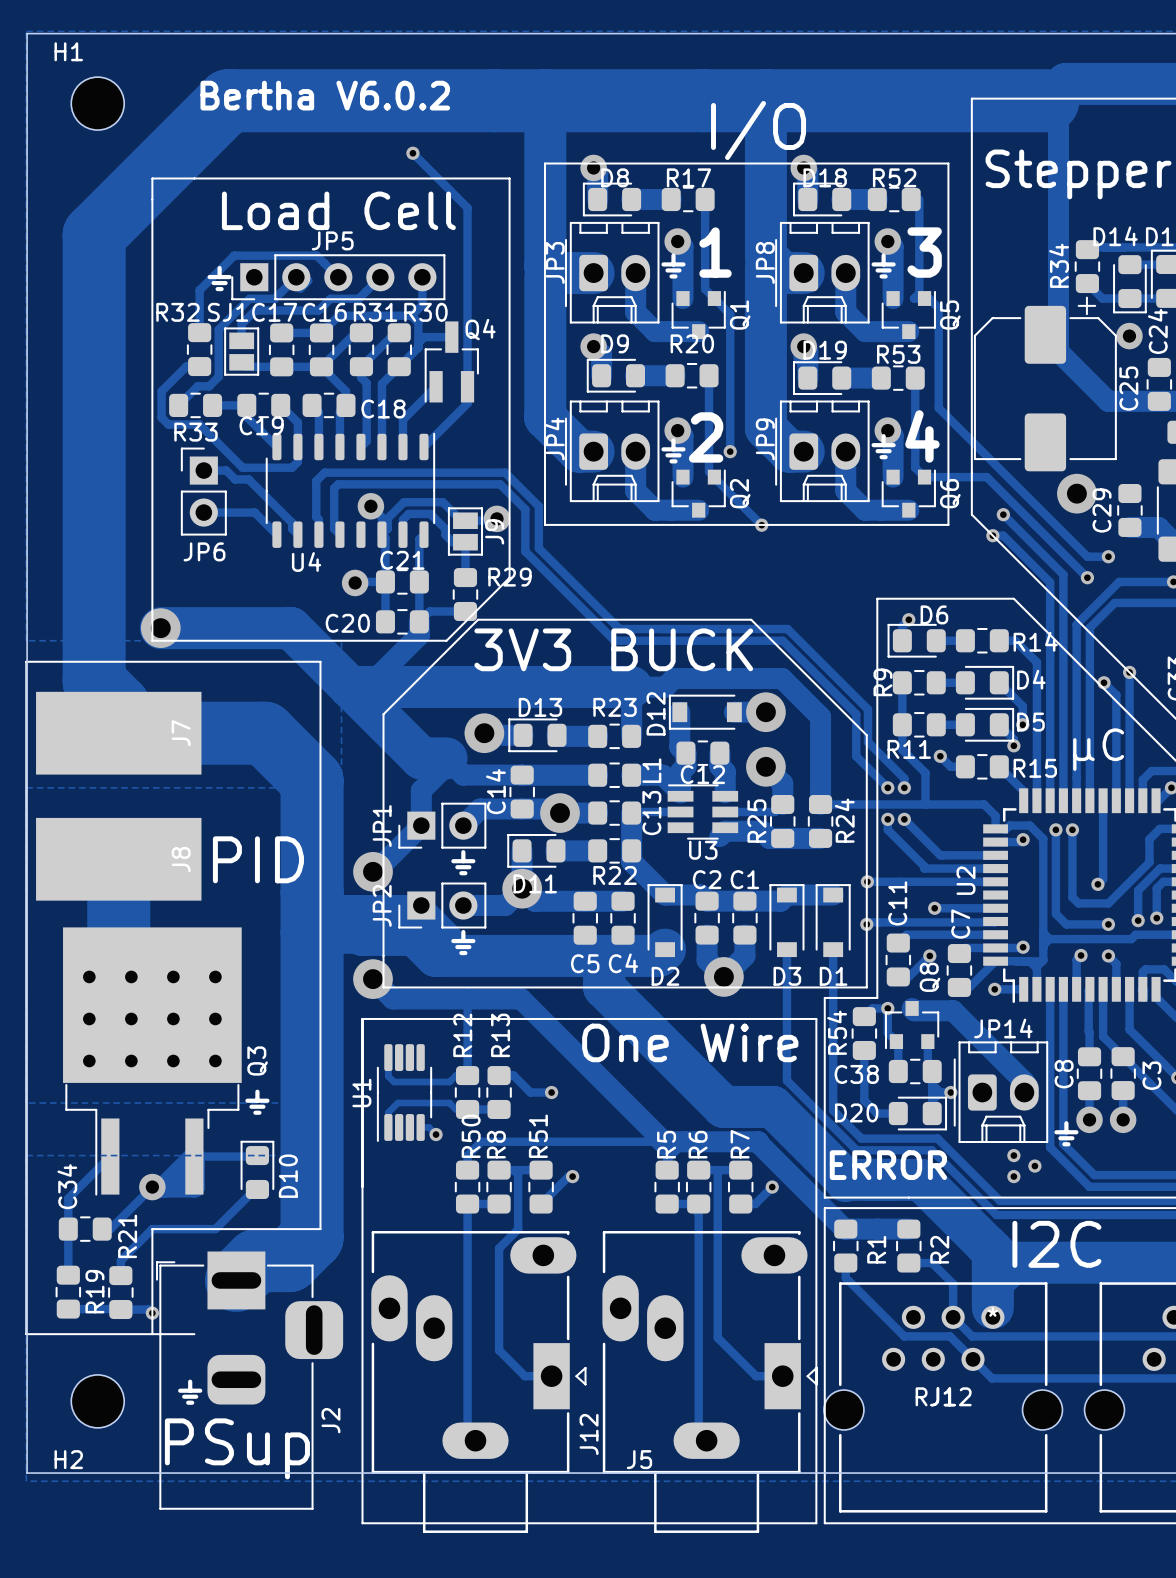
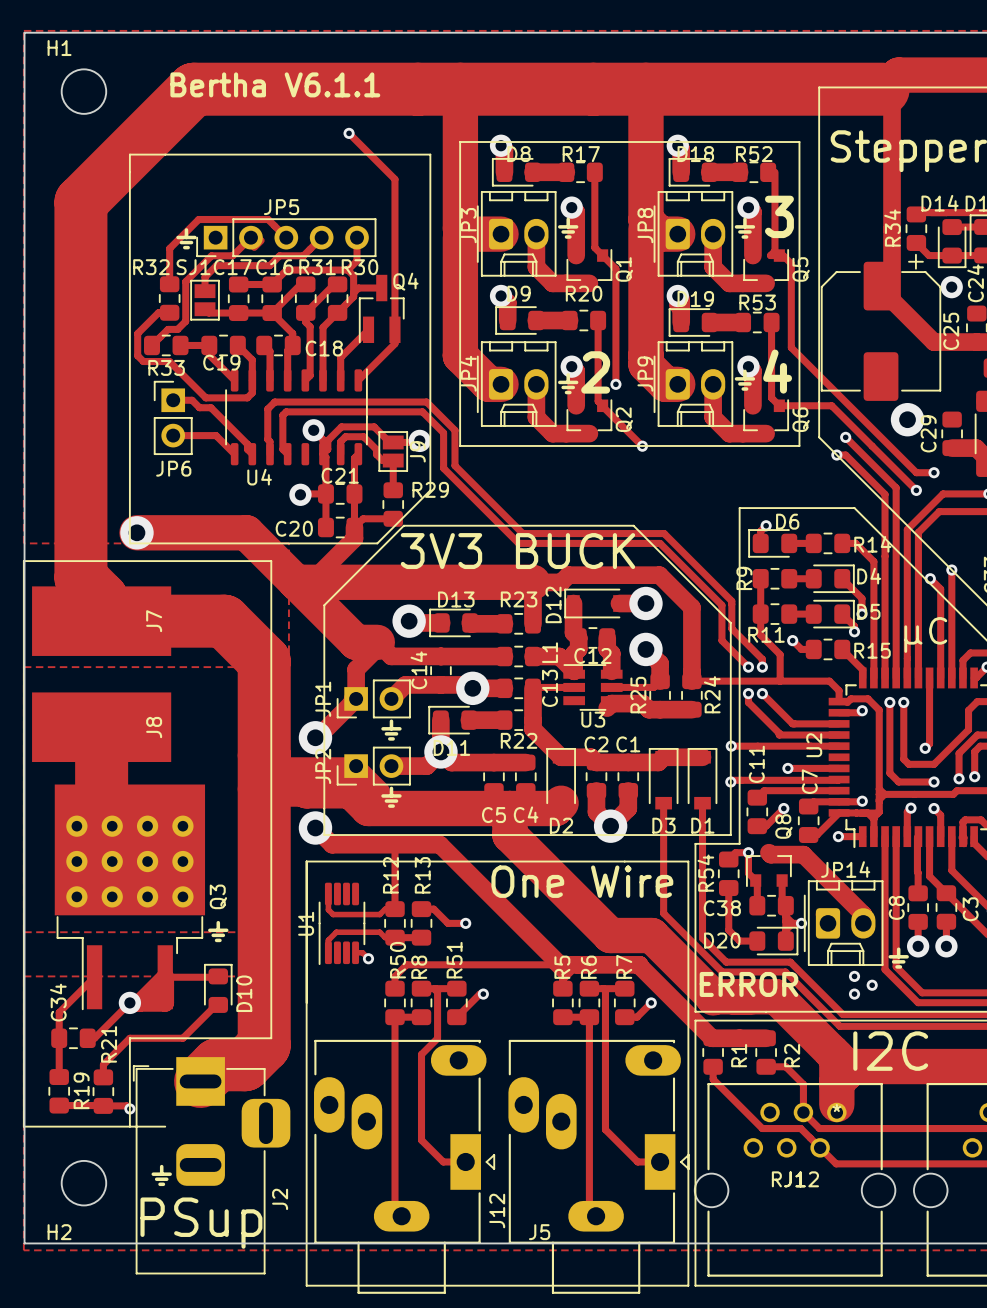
text: Bertha V6.0.2 (325, 95) -> Bertha V6.1.1 (275, 84)
text: I/O (758, 130) -> none
text: Load Cell (338, 210) -> none
text: 1 (715, 252) -> none
text: PID (258, 859) -> none

